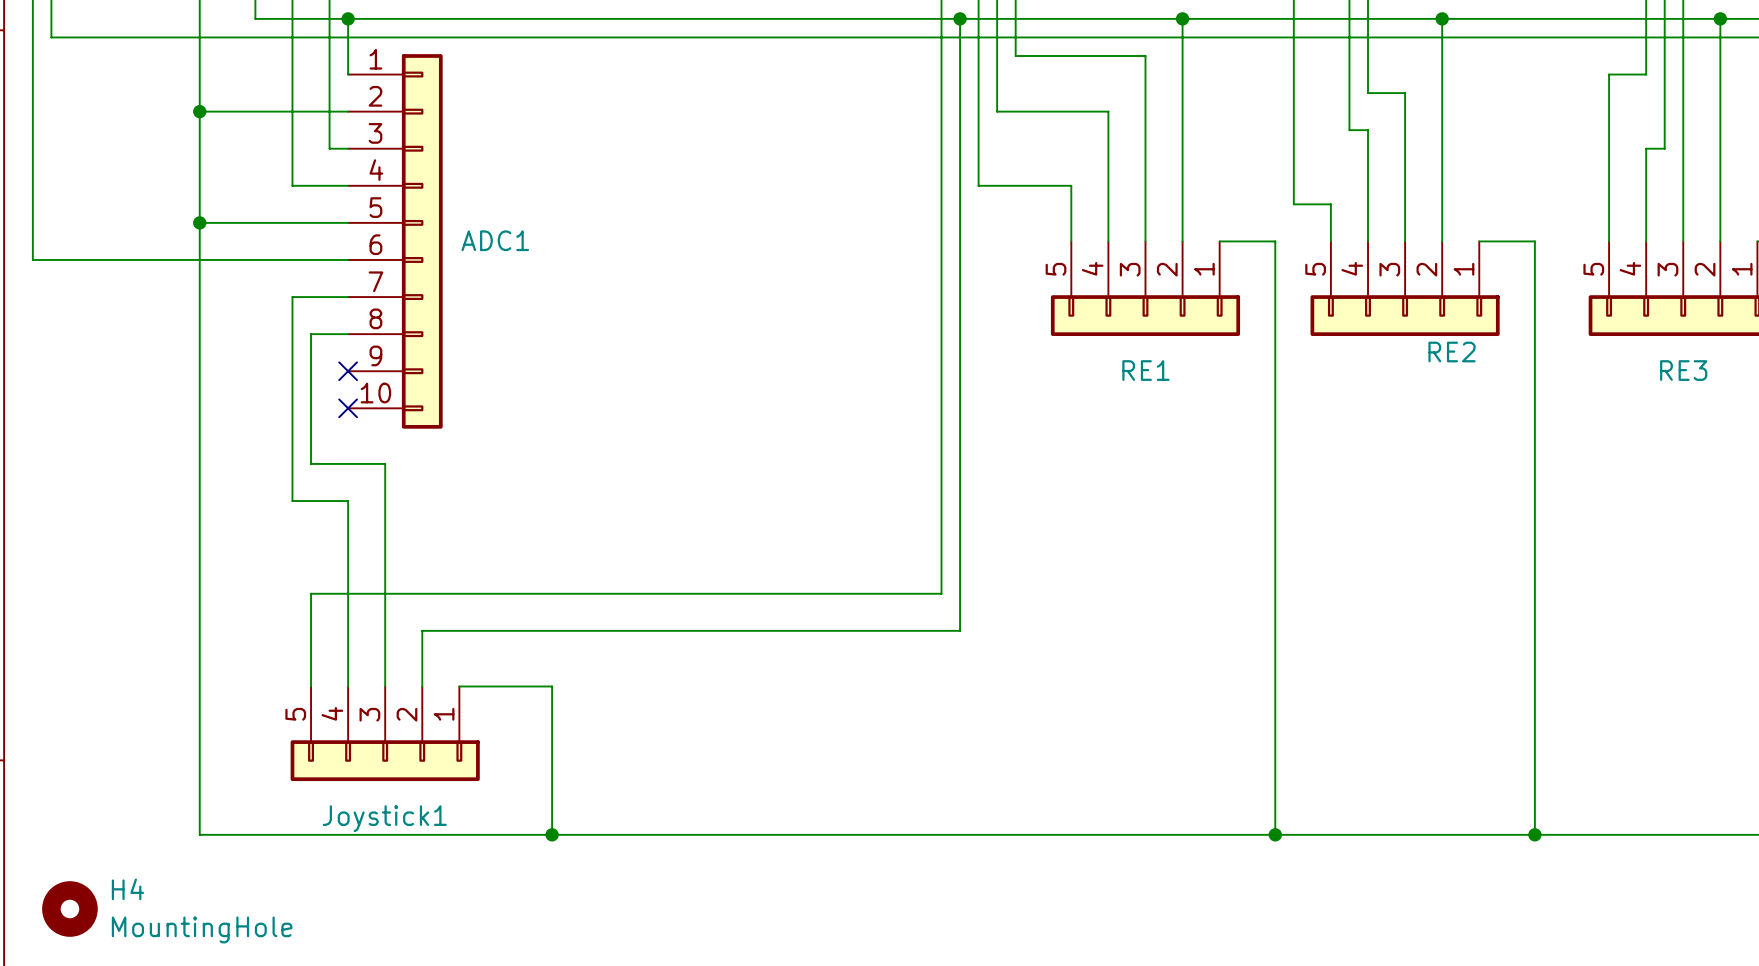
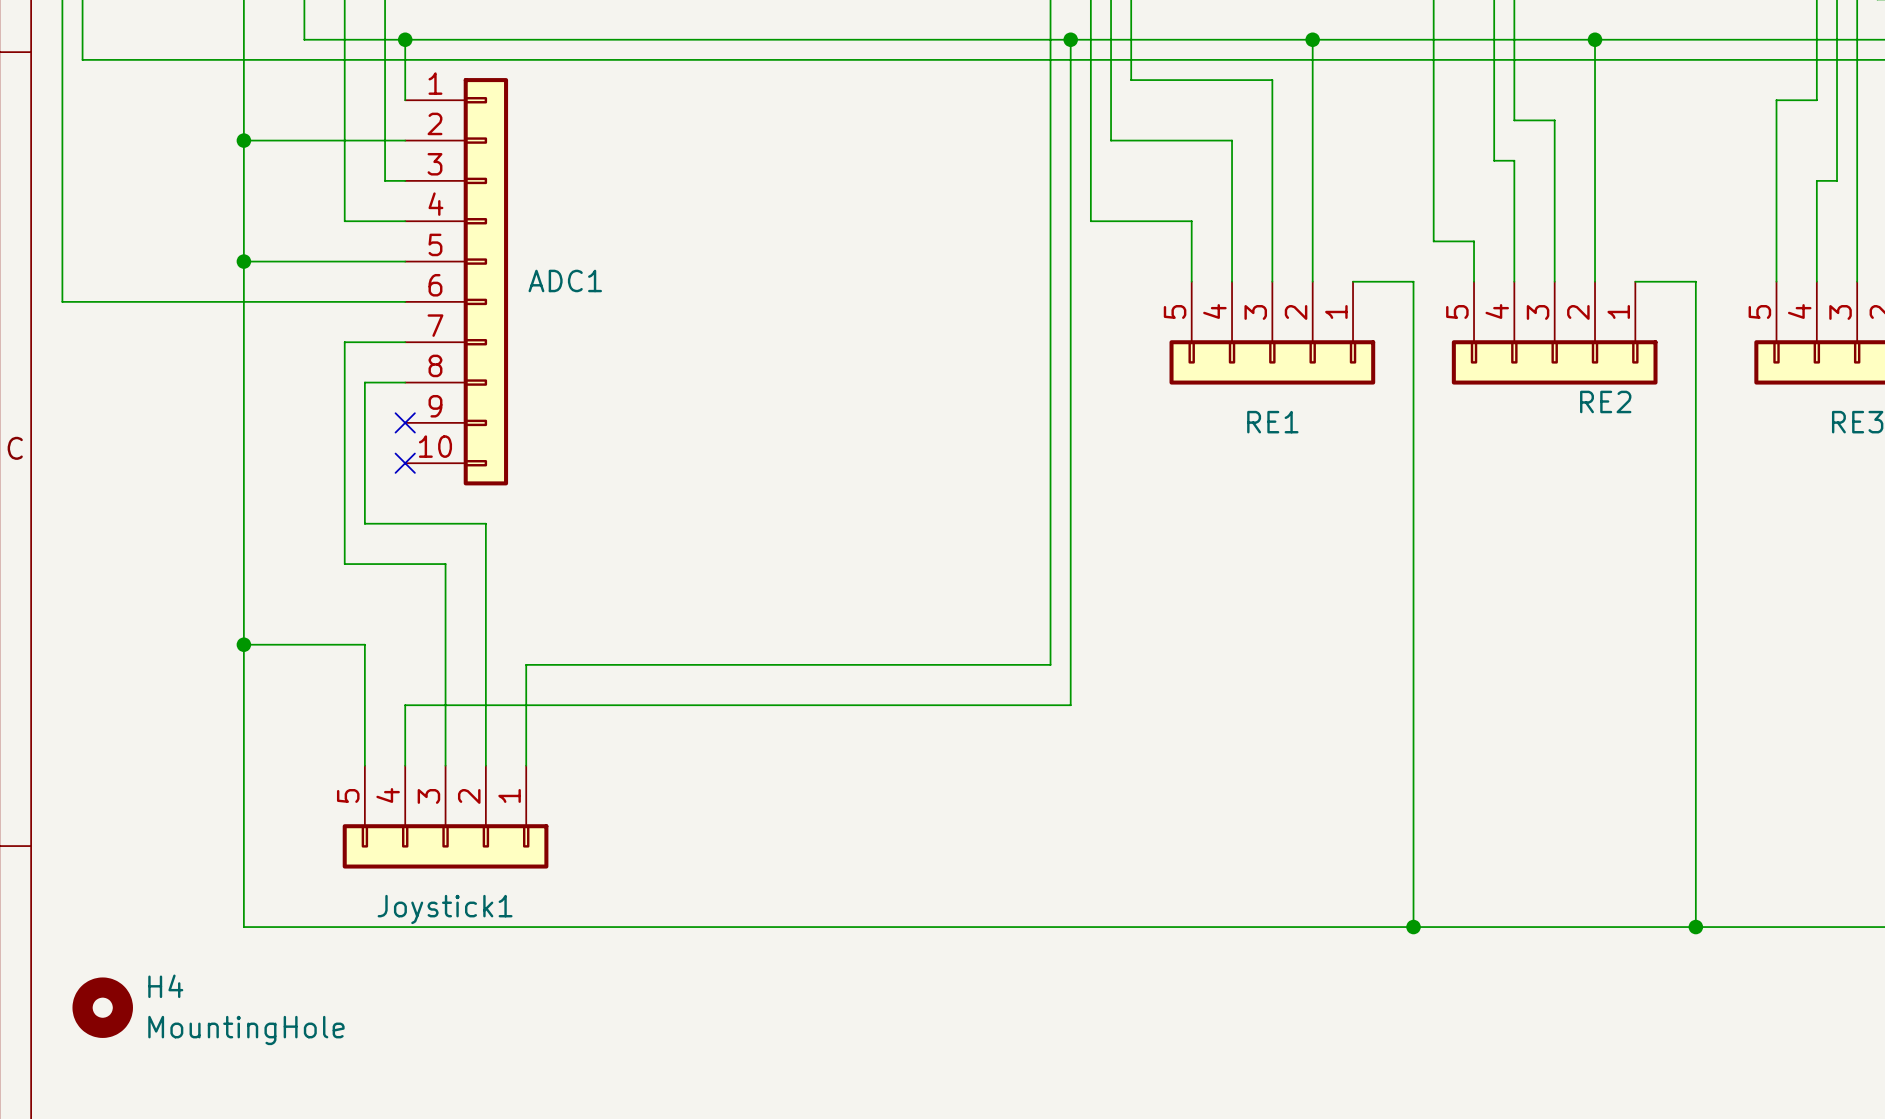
wire: (385, 463) (385, 501) -> (405, 564) (445, 564)
wire: (348, 501) (348, 630) -> (445, 523) (485, 523) (485, 705) (405, 705)
wire: none -> (243, 644) (364, 644) (364, 664)
junction: none -> (243, 644)
wire: (311, 593) (459, 593) -> (526, 765) (526, 664)
wire: (459, 686) (552, 686) (552, 834) -> none
junction: (552, 834) -> none

